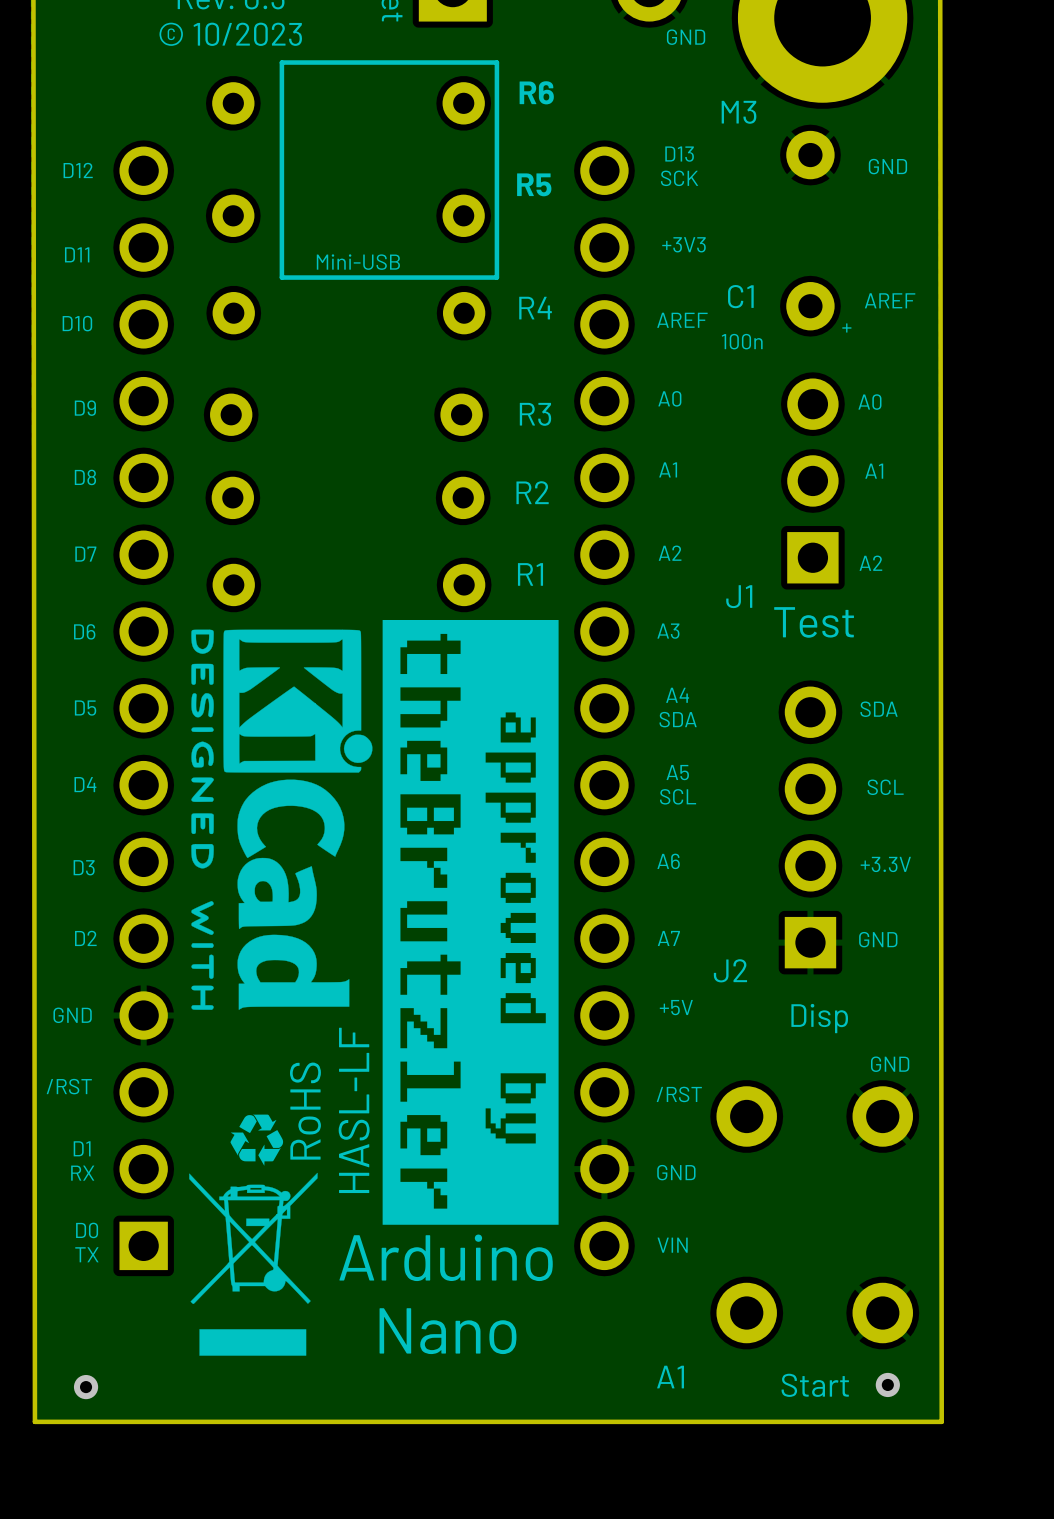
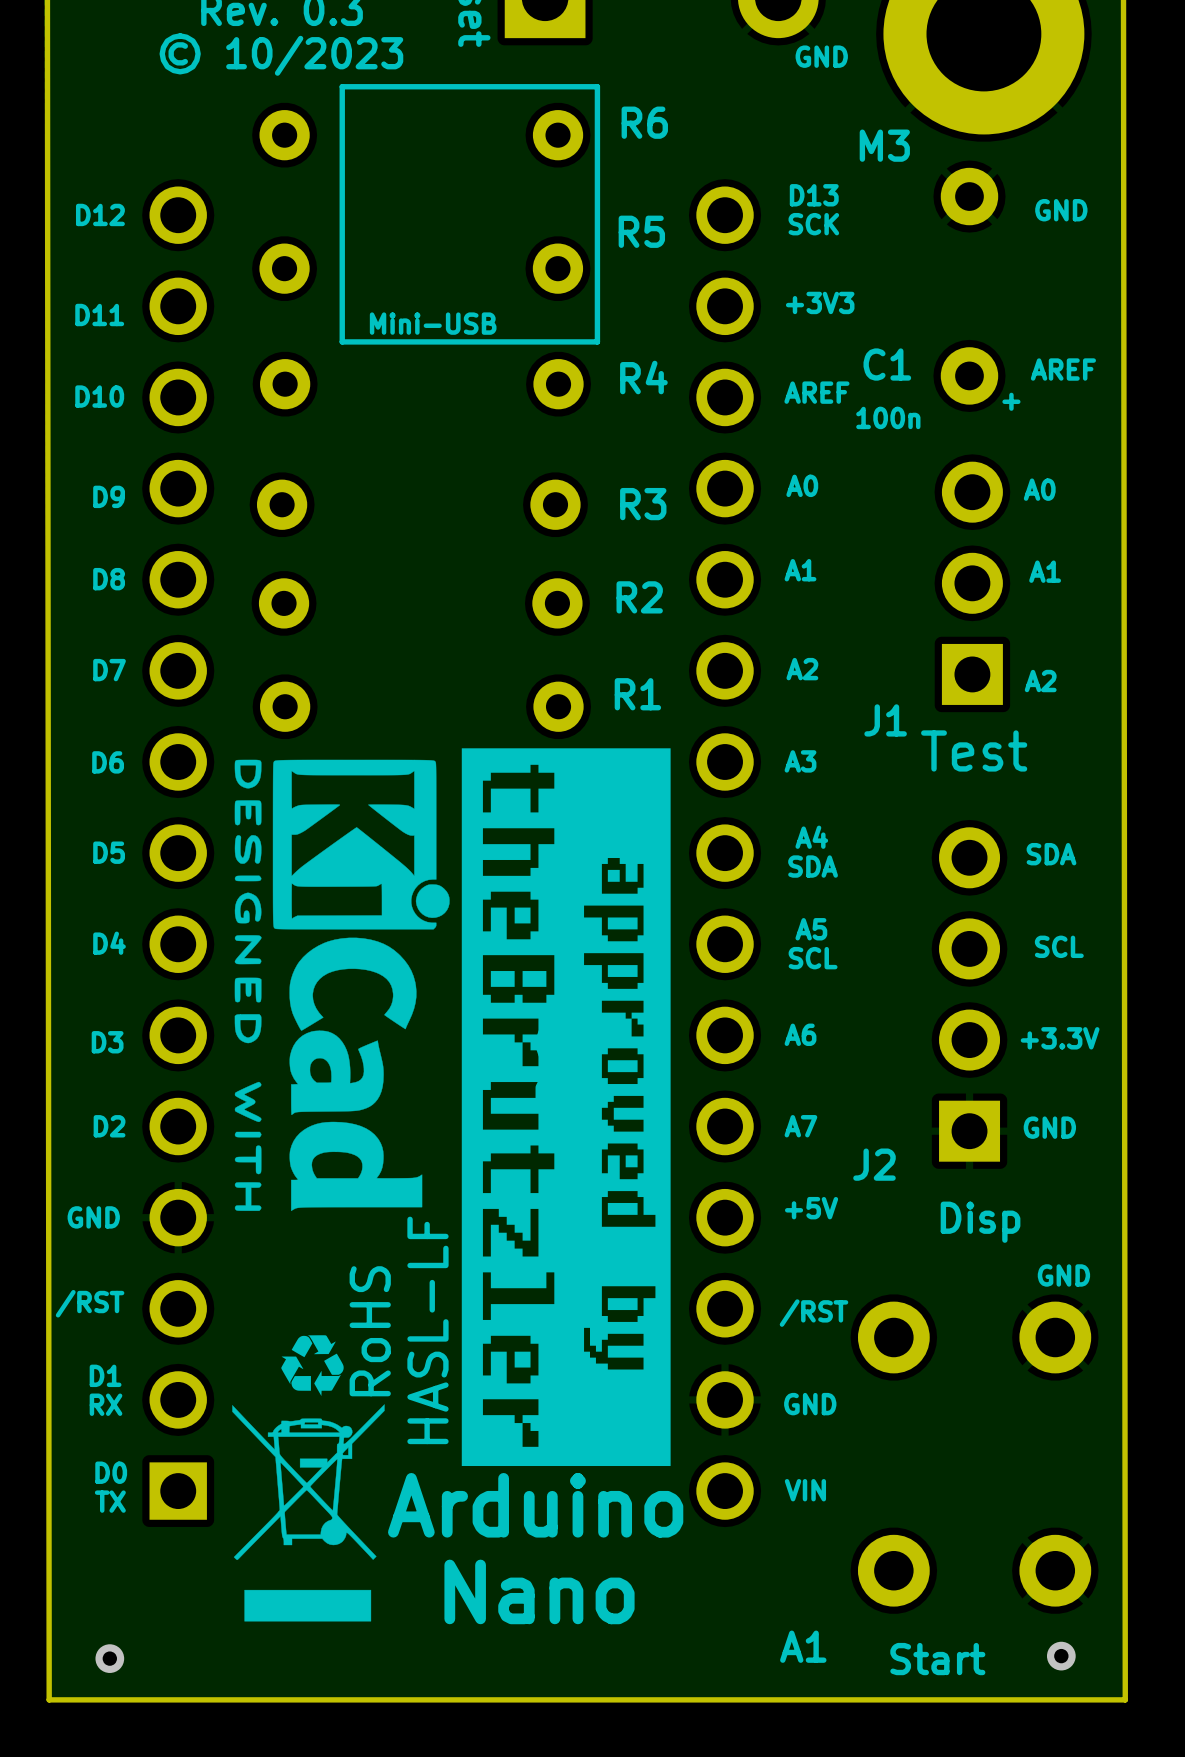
text position: Start (815, 1385) -> Start (937, 1659)

